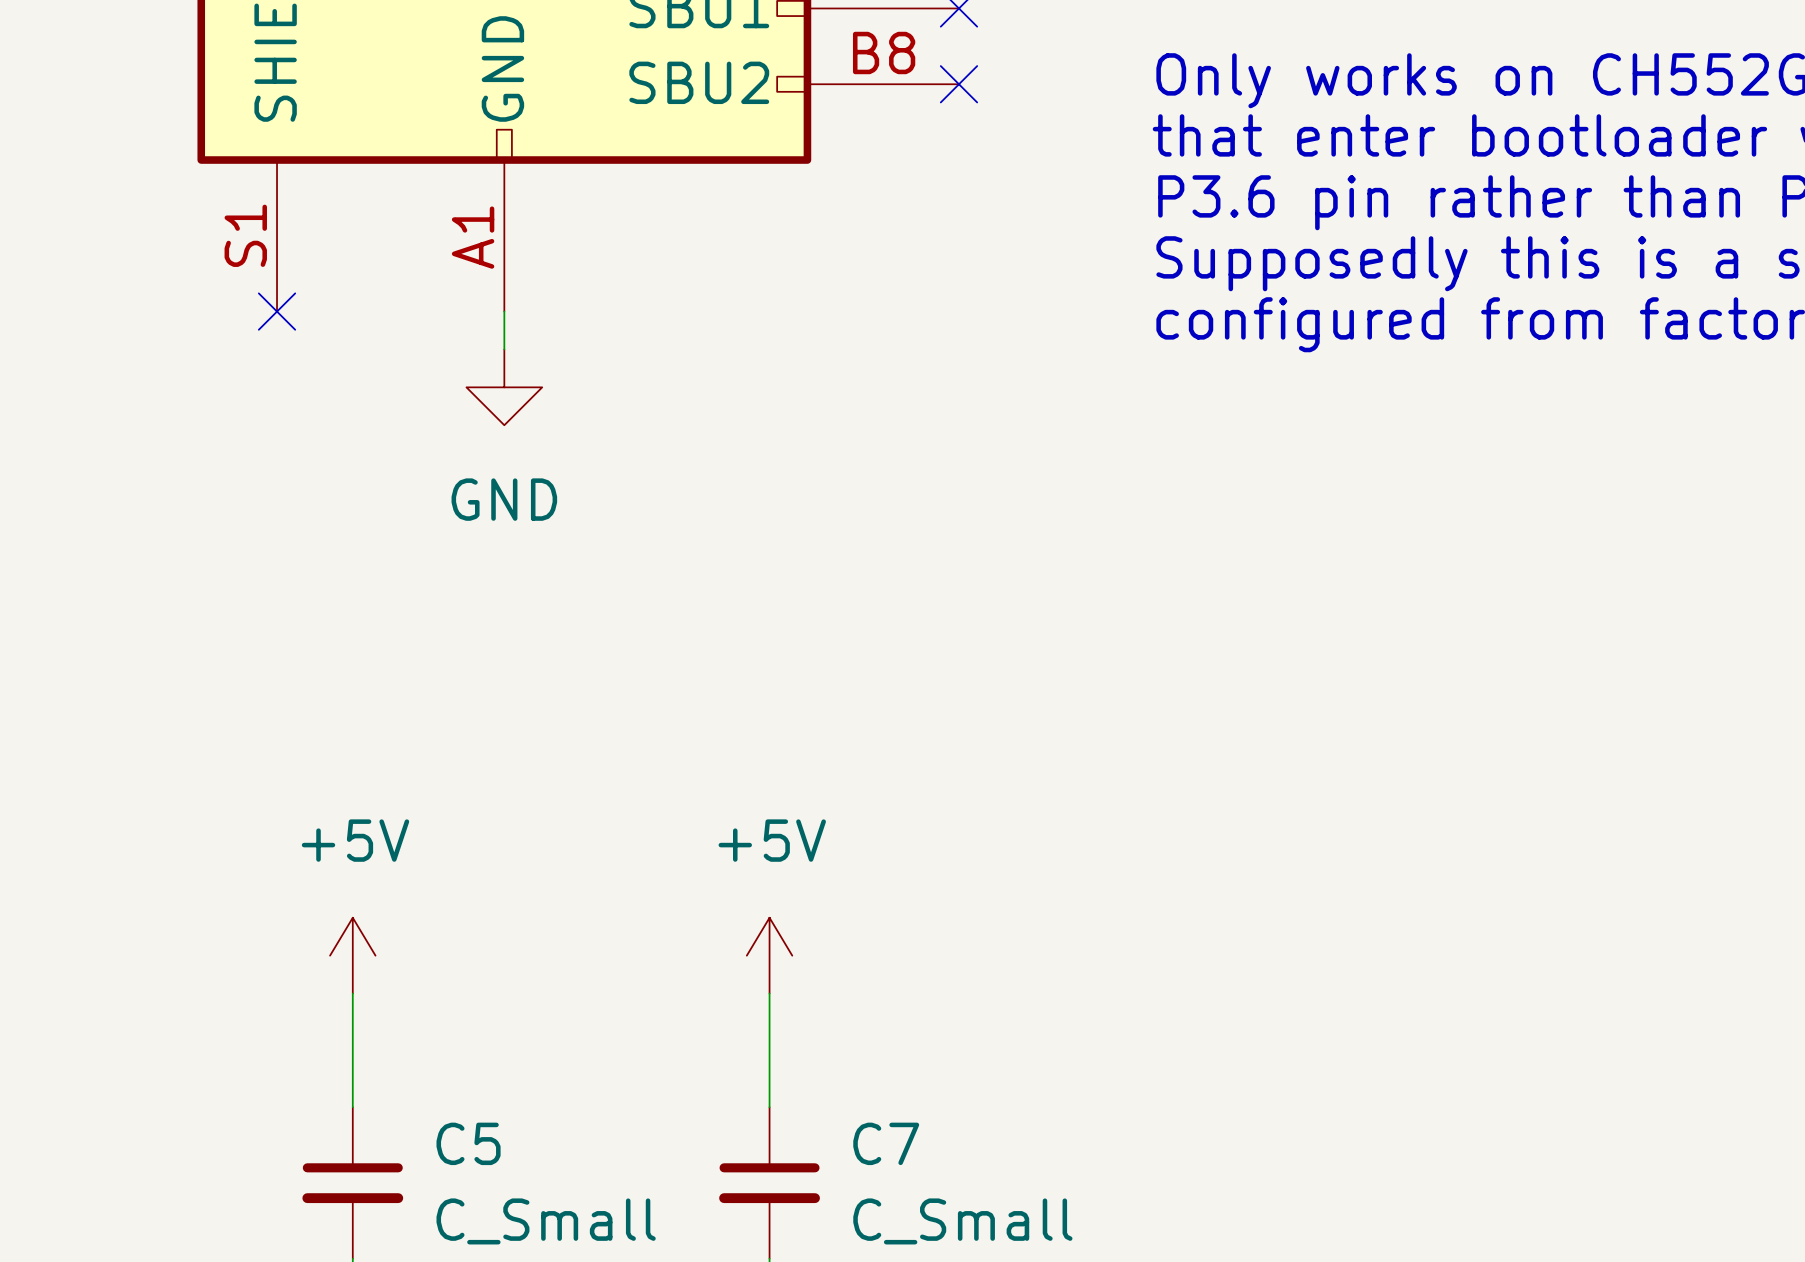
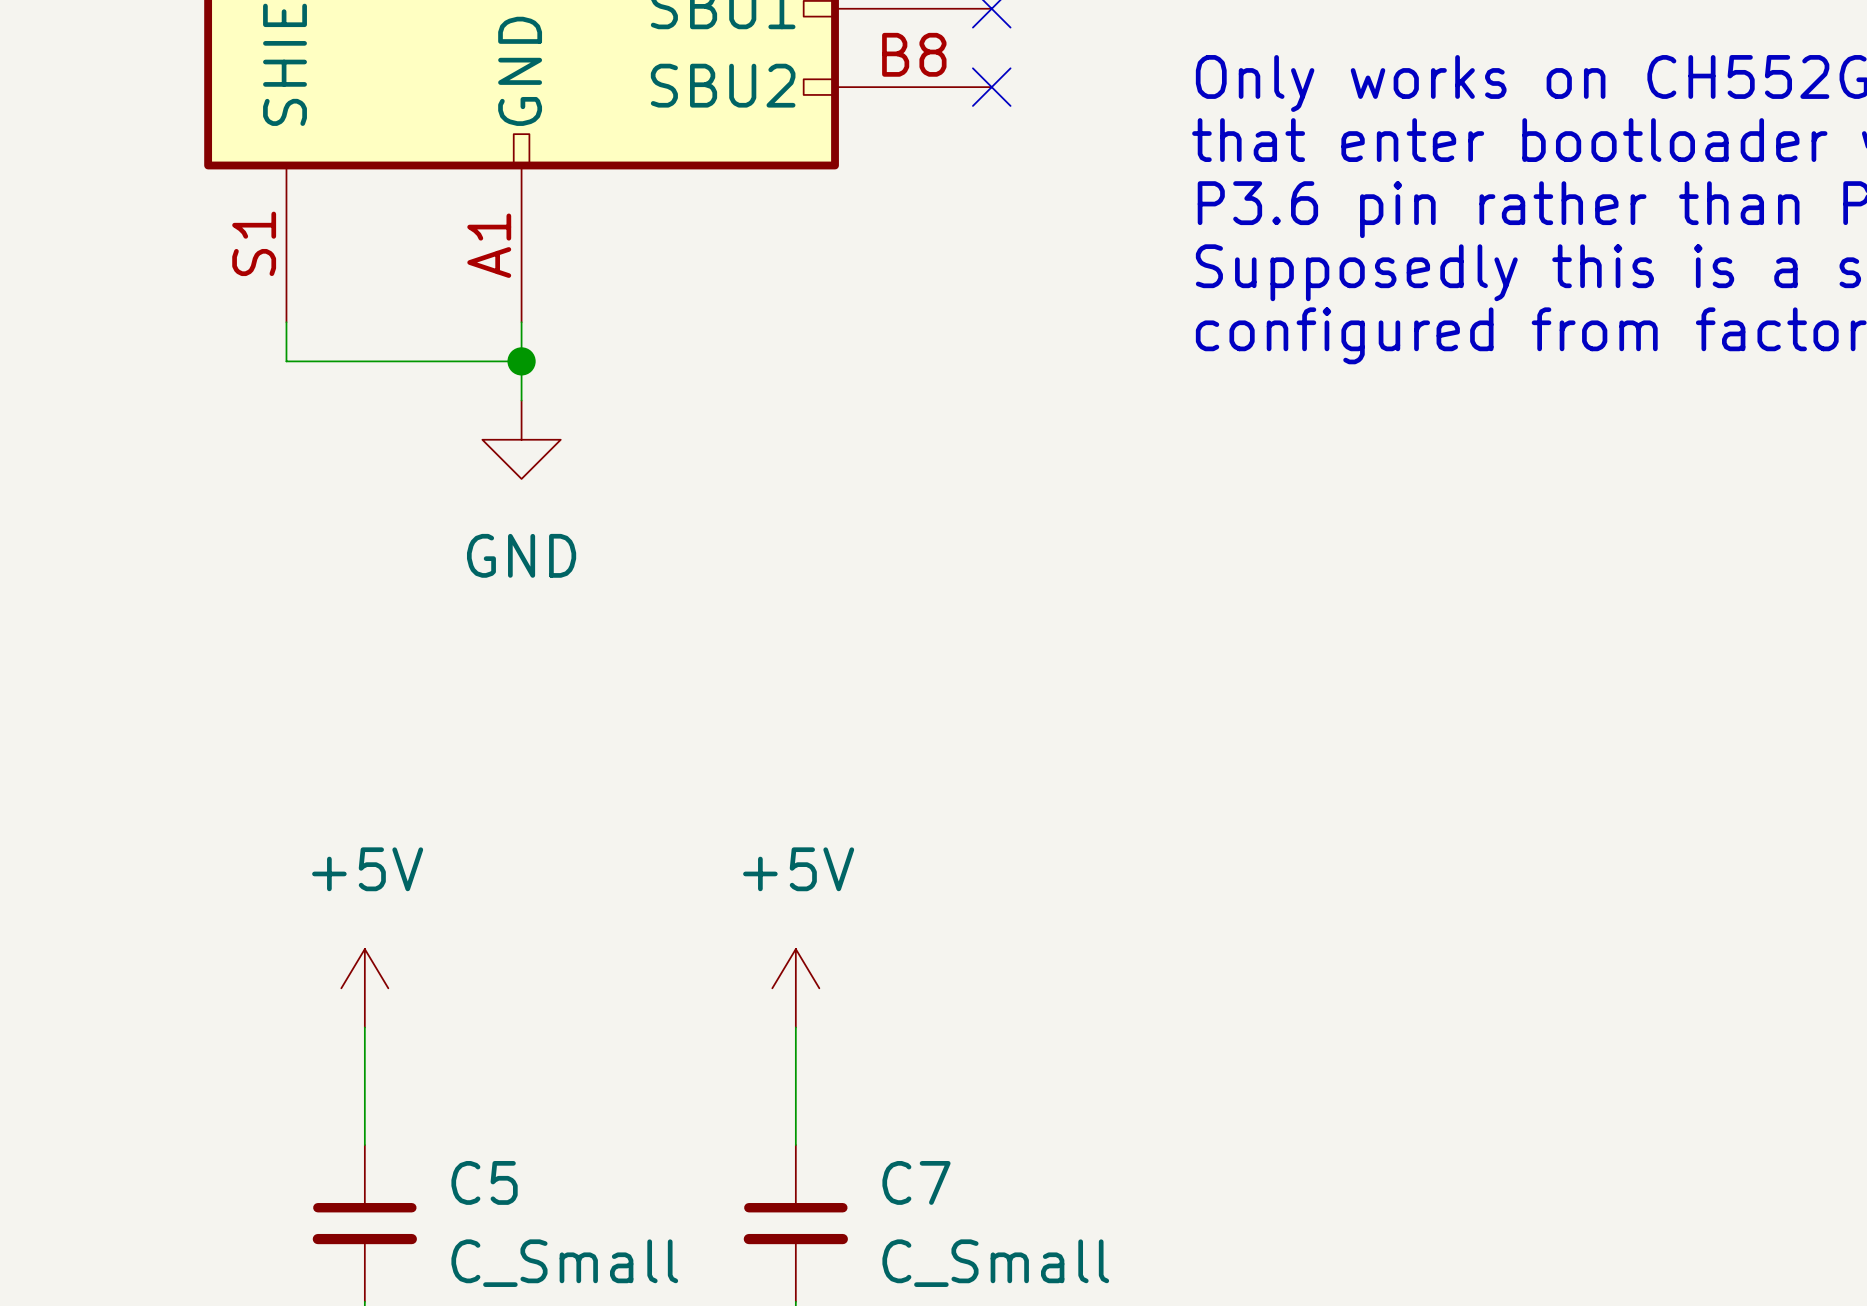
wire: none -> (286, 322) (286, 361) (521, 361) (521, 400)
no-connect mark: (277, 311) -> none
junction: none -> (521, 361)
power symbol position: GND (504, 387) -> GND (521, 439)

